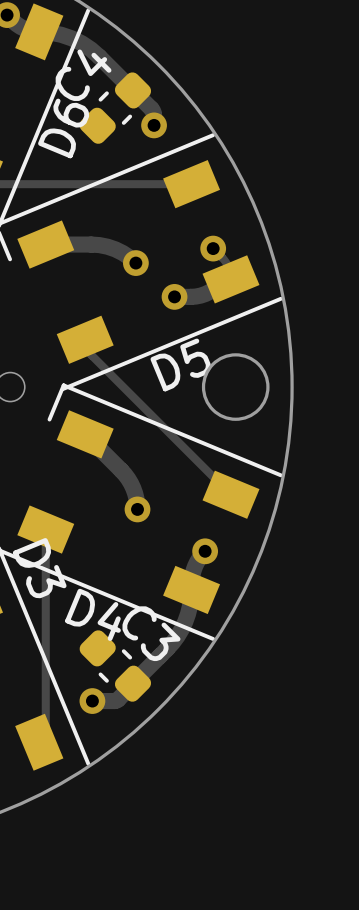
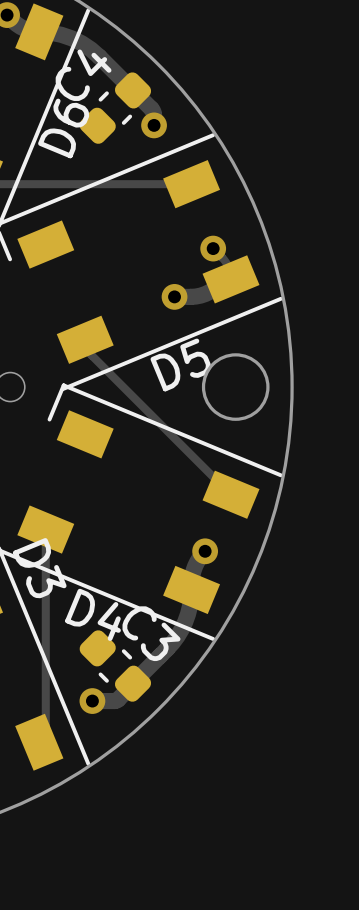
track: (45, 244) (91, 244) (107, 246) (122, 253) (135, 263) -> none
via: (135, 263) -> none
track: (85, 434) (128, 478) (135, 493) (137, 509) -> none
via: (137, 509) -> none

